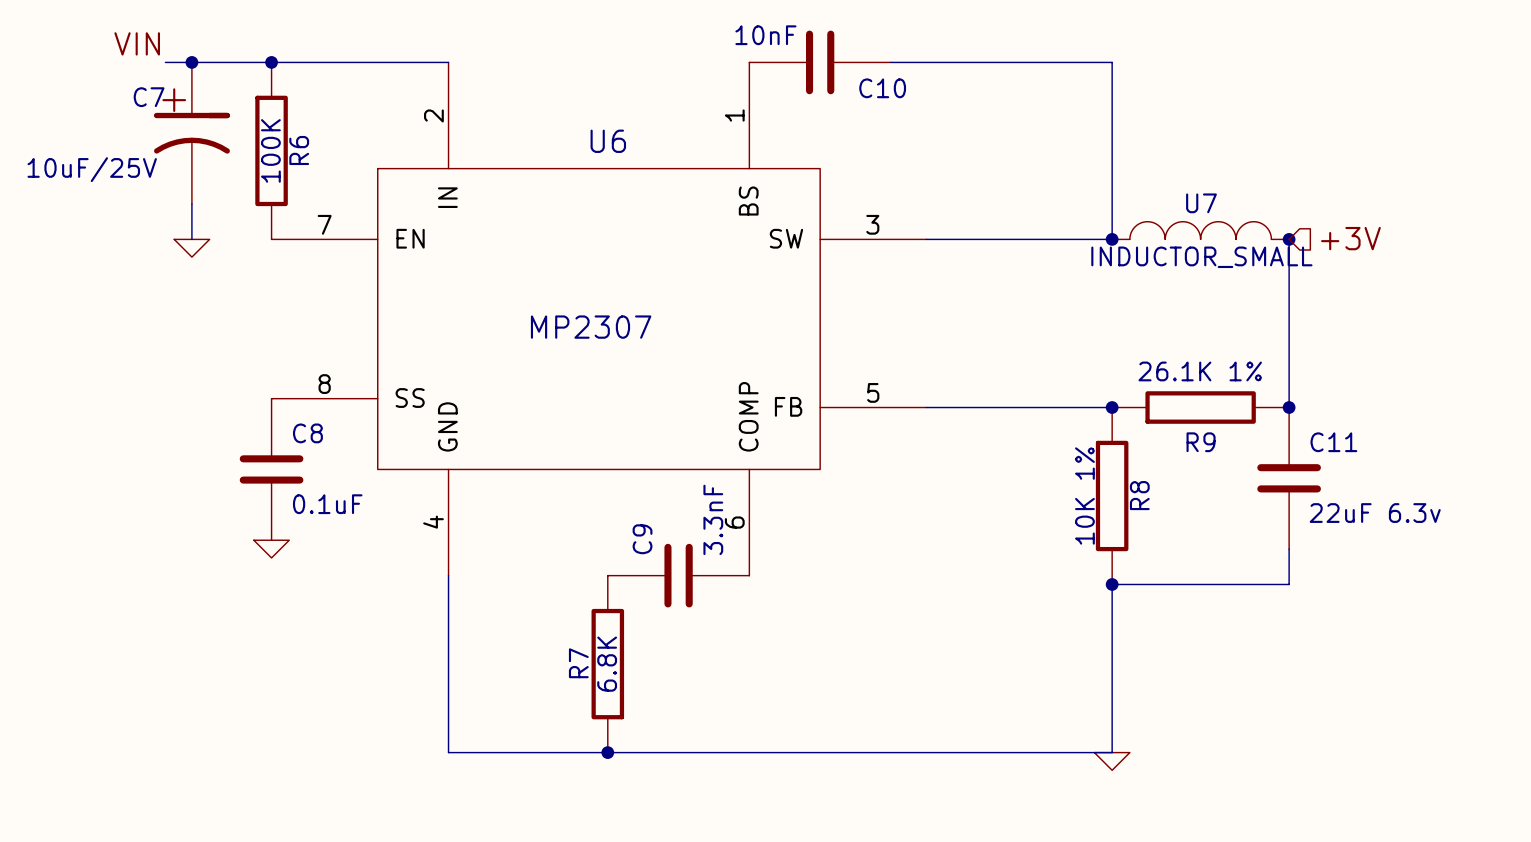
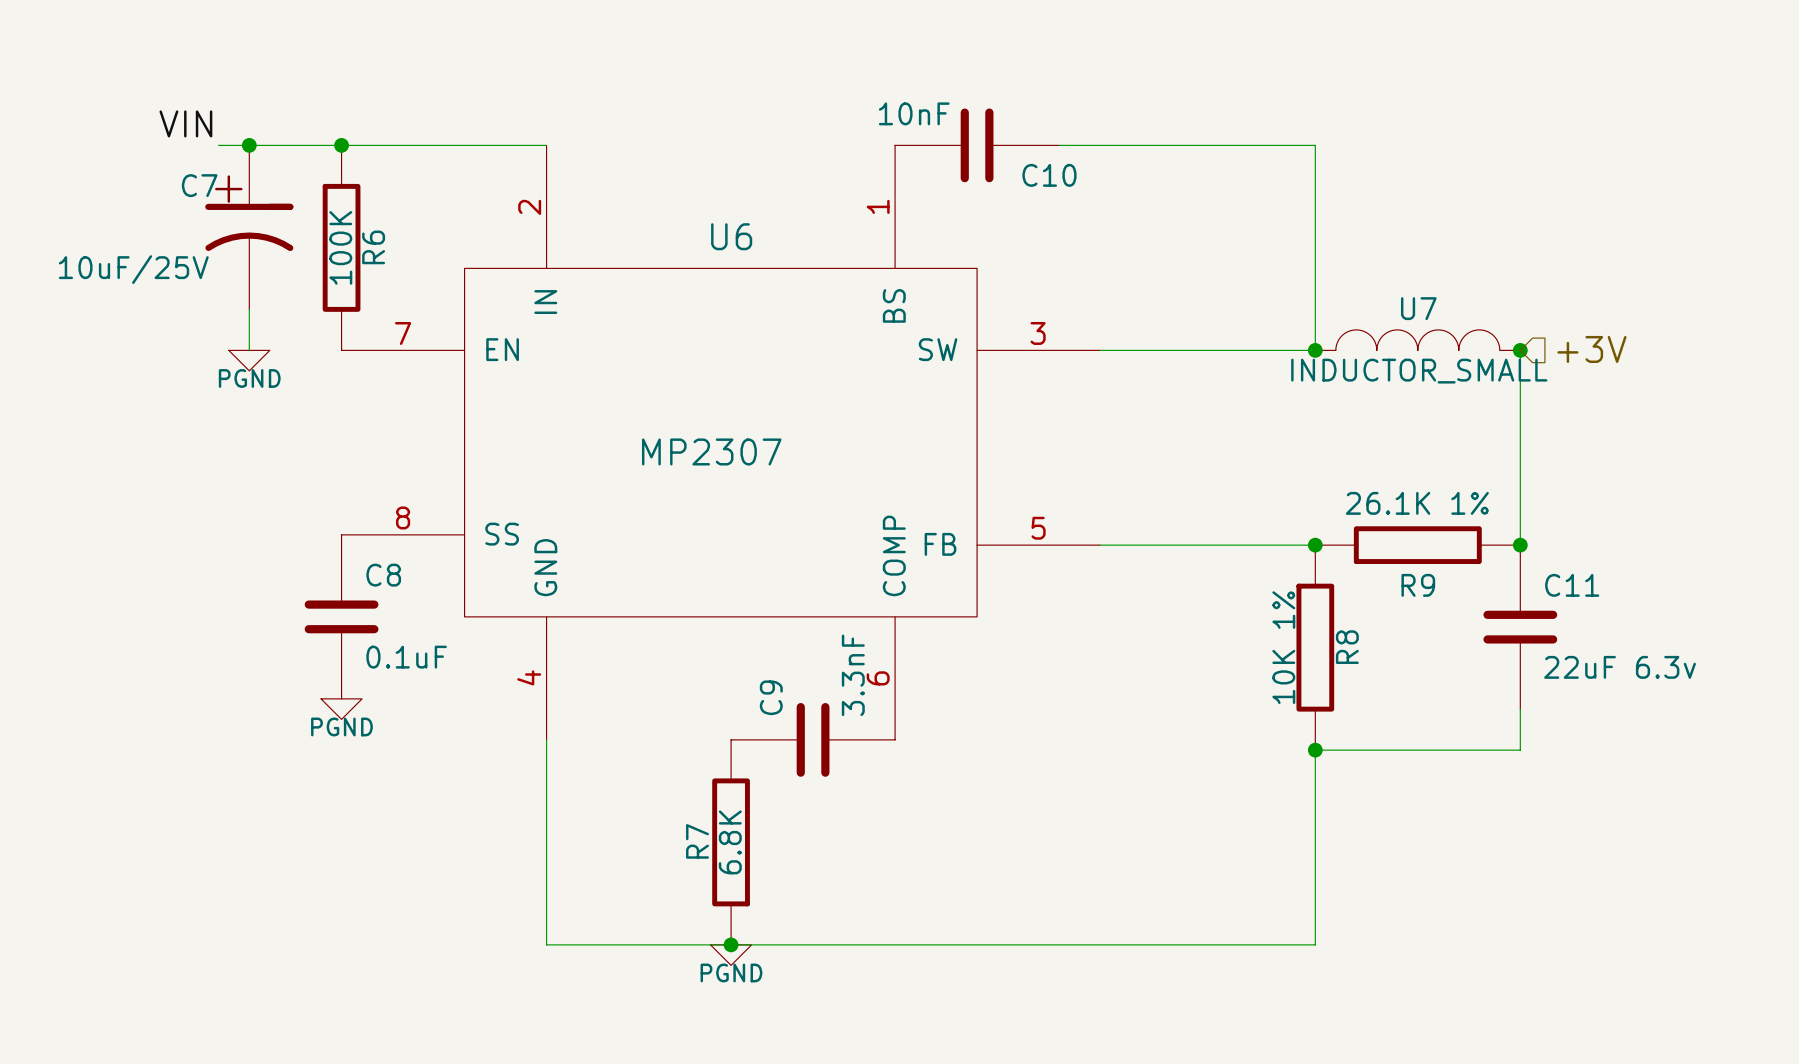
power symbol text: none -> PGND (249, 378)
power symbol text: none -> PGND (341, 726)
power symbol: none -> PGND (731, 955)
power symbol: (1112, 761) -> none

